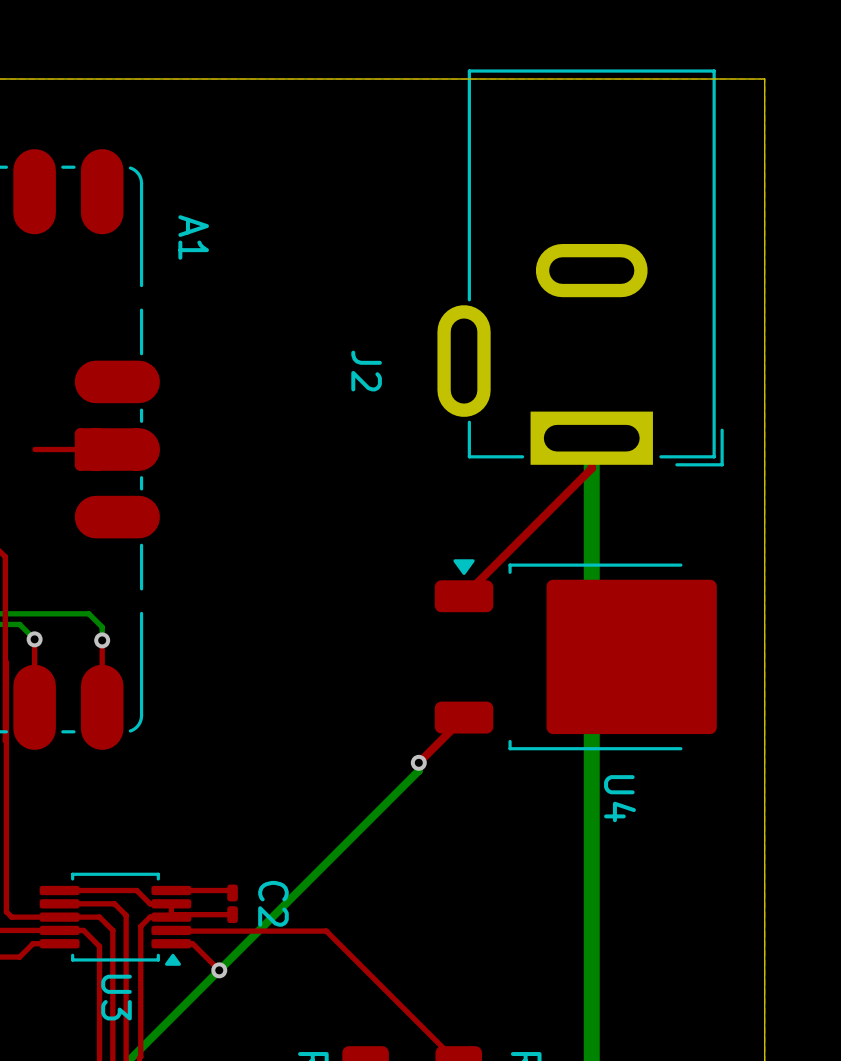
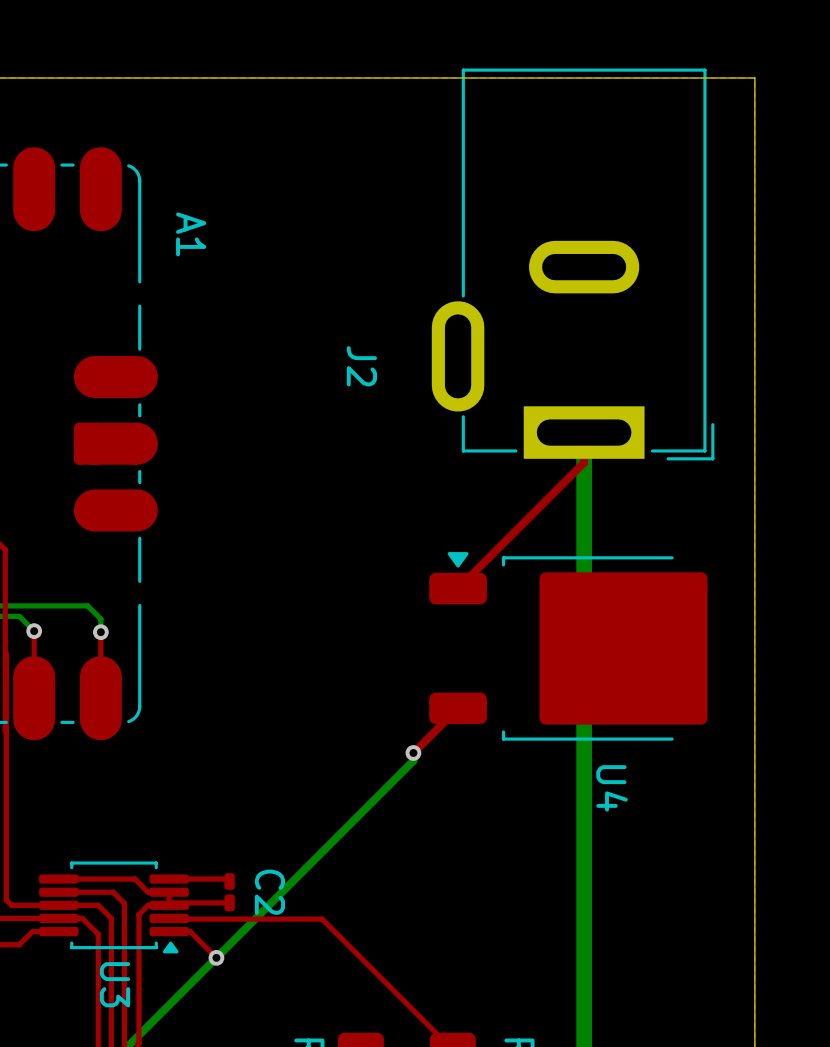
top track: (35, 449) (96, 449) -> none

